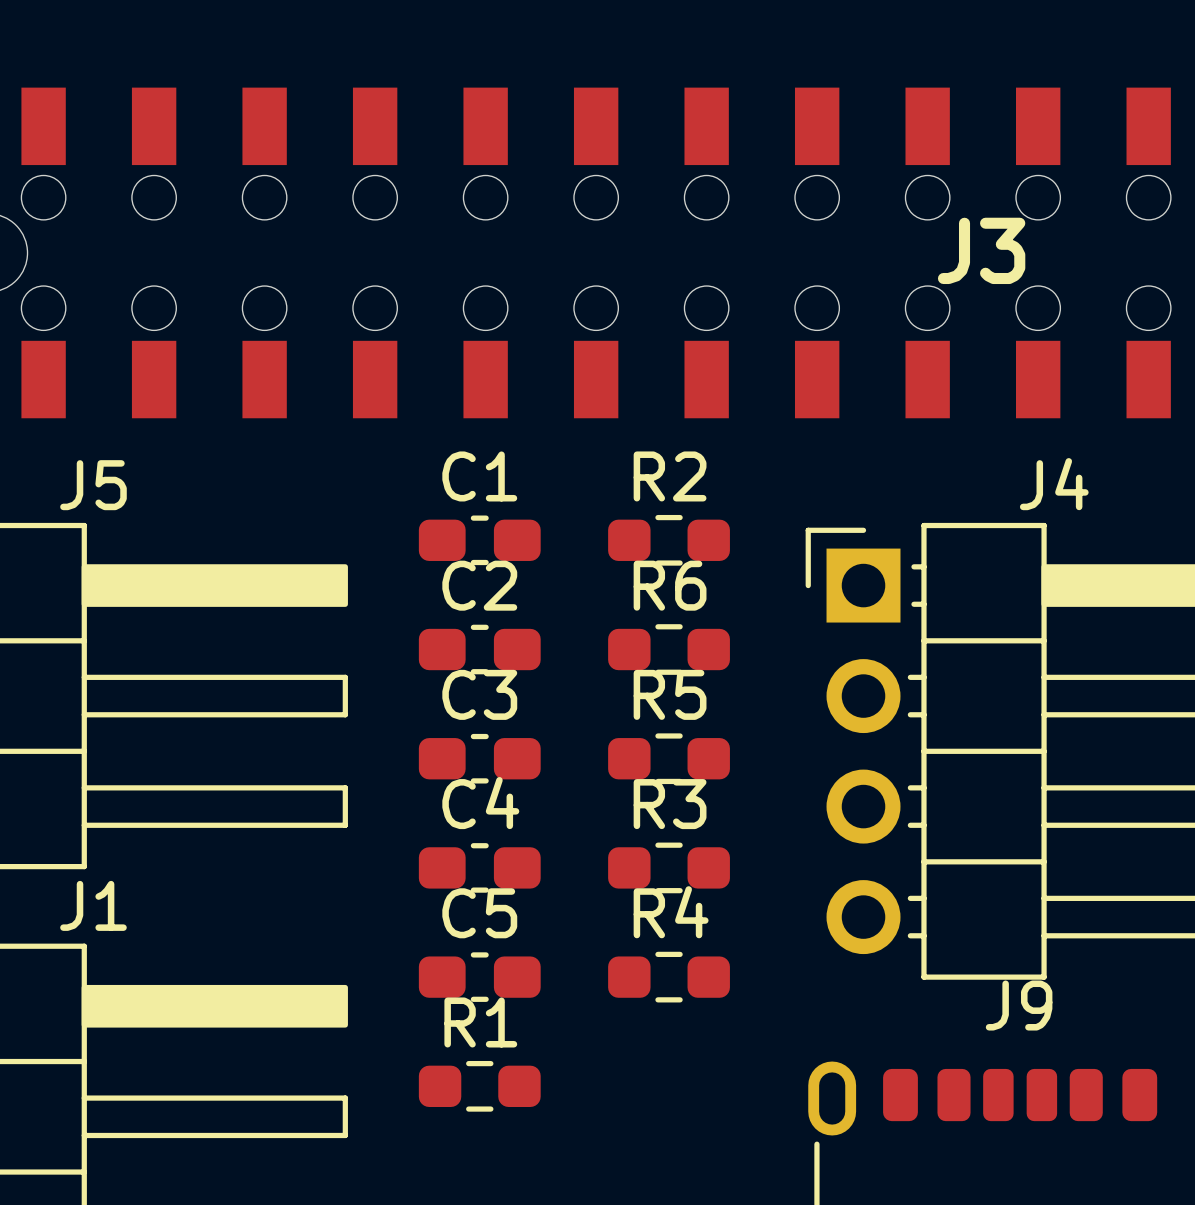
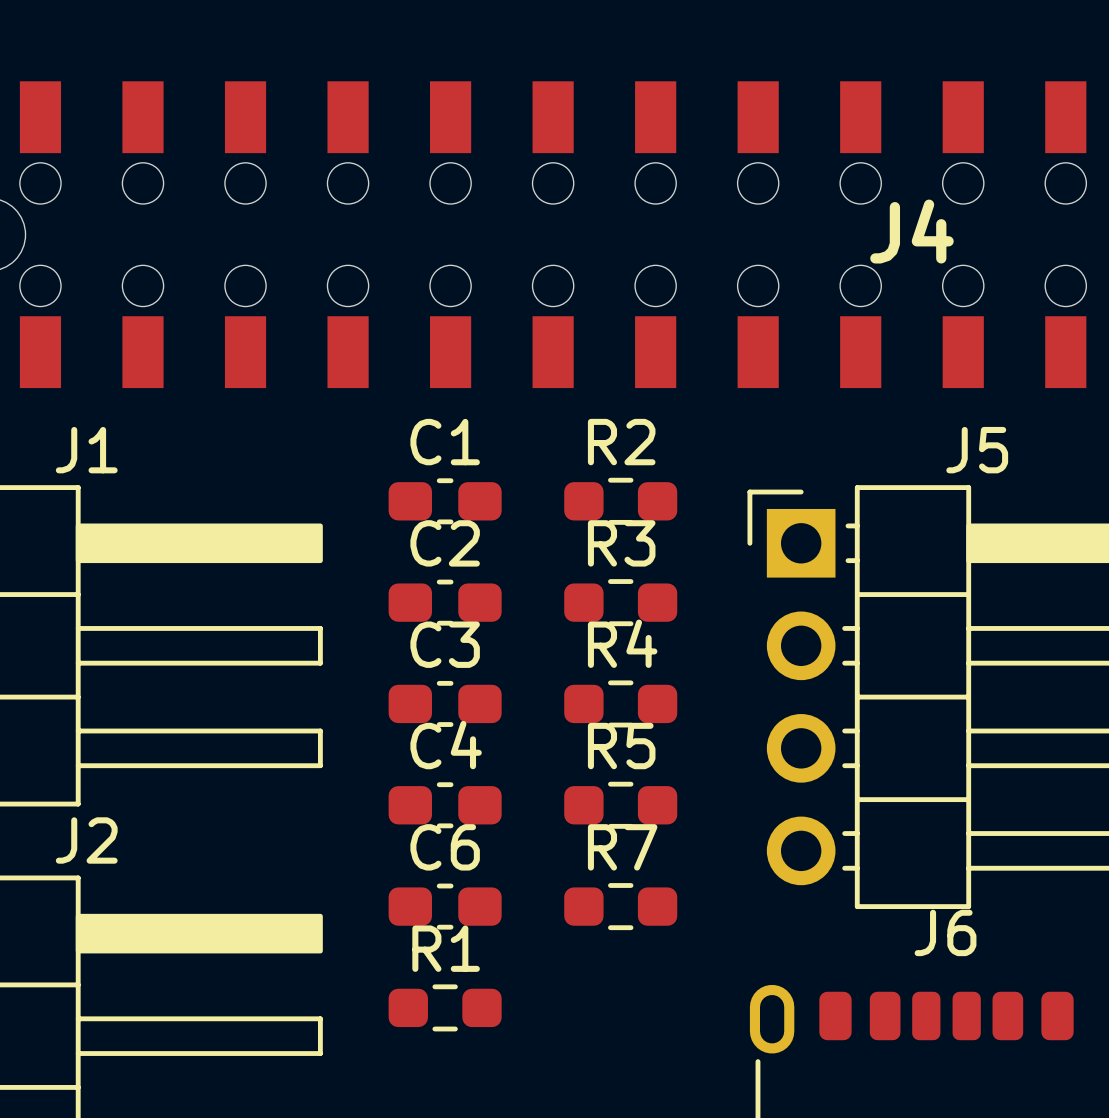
J3 name: J3 (981, 250) -> J4 (911, 231)
J4 name: J4 (1054, 484) -> J5 (977, 450)
J5 name: J5 (93, 485) -> J1 (86, 450)
R6 name: R6 (670, 585) -> R3 (621, 543)
R5 name: R5 (670, 694) -> R4 (622, 643)
R3 name: R3 (670, 804) -> R5 (621, 746)
J1 name: J1 (93, 905) -> J2 (86, 840)
R4 name: R4 (671, 912) -> R7 (622, 847)
C5 name: C5 (479, 913) -> C6 (445, 847)
J9 name: J9 (1019, 1005) -> J6 (945, 932)

